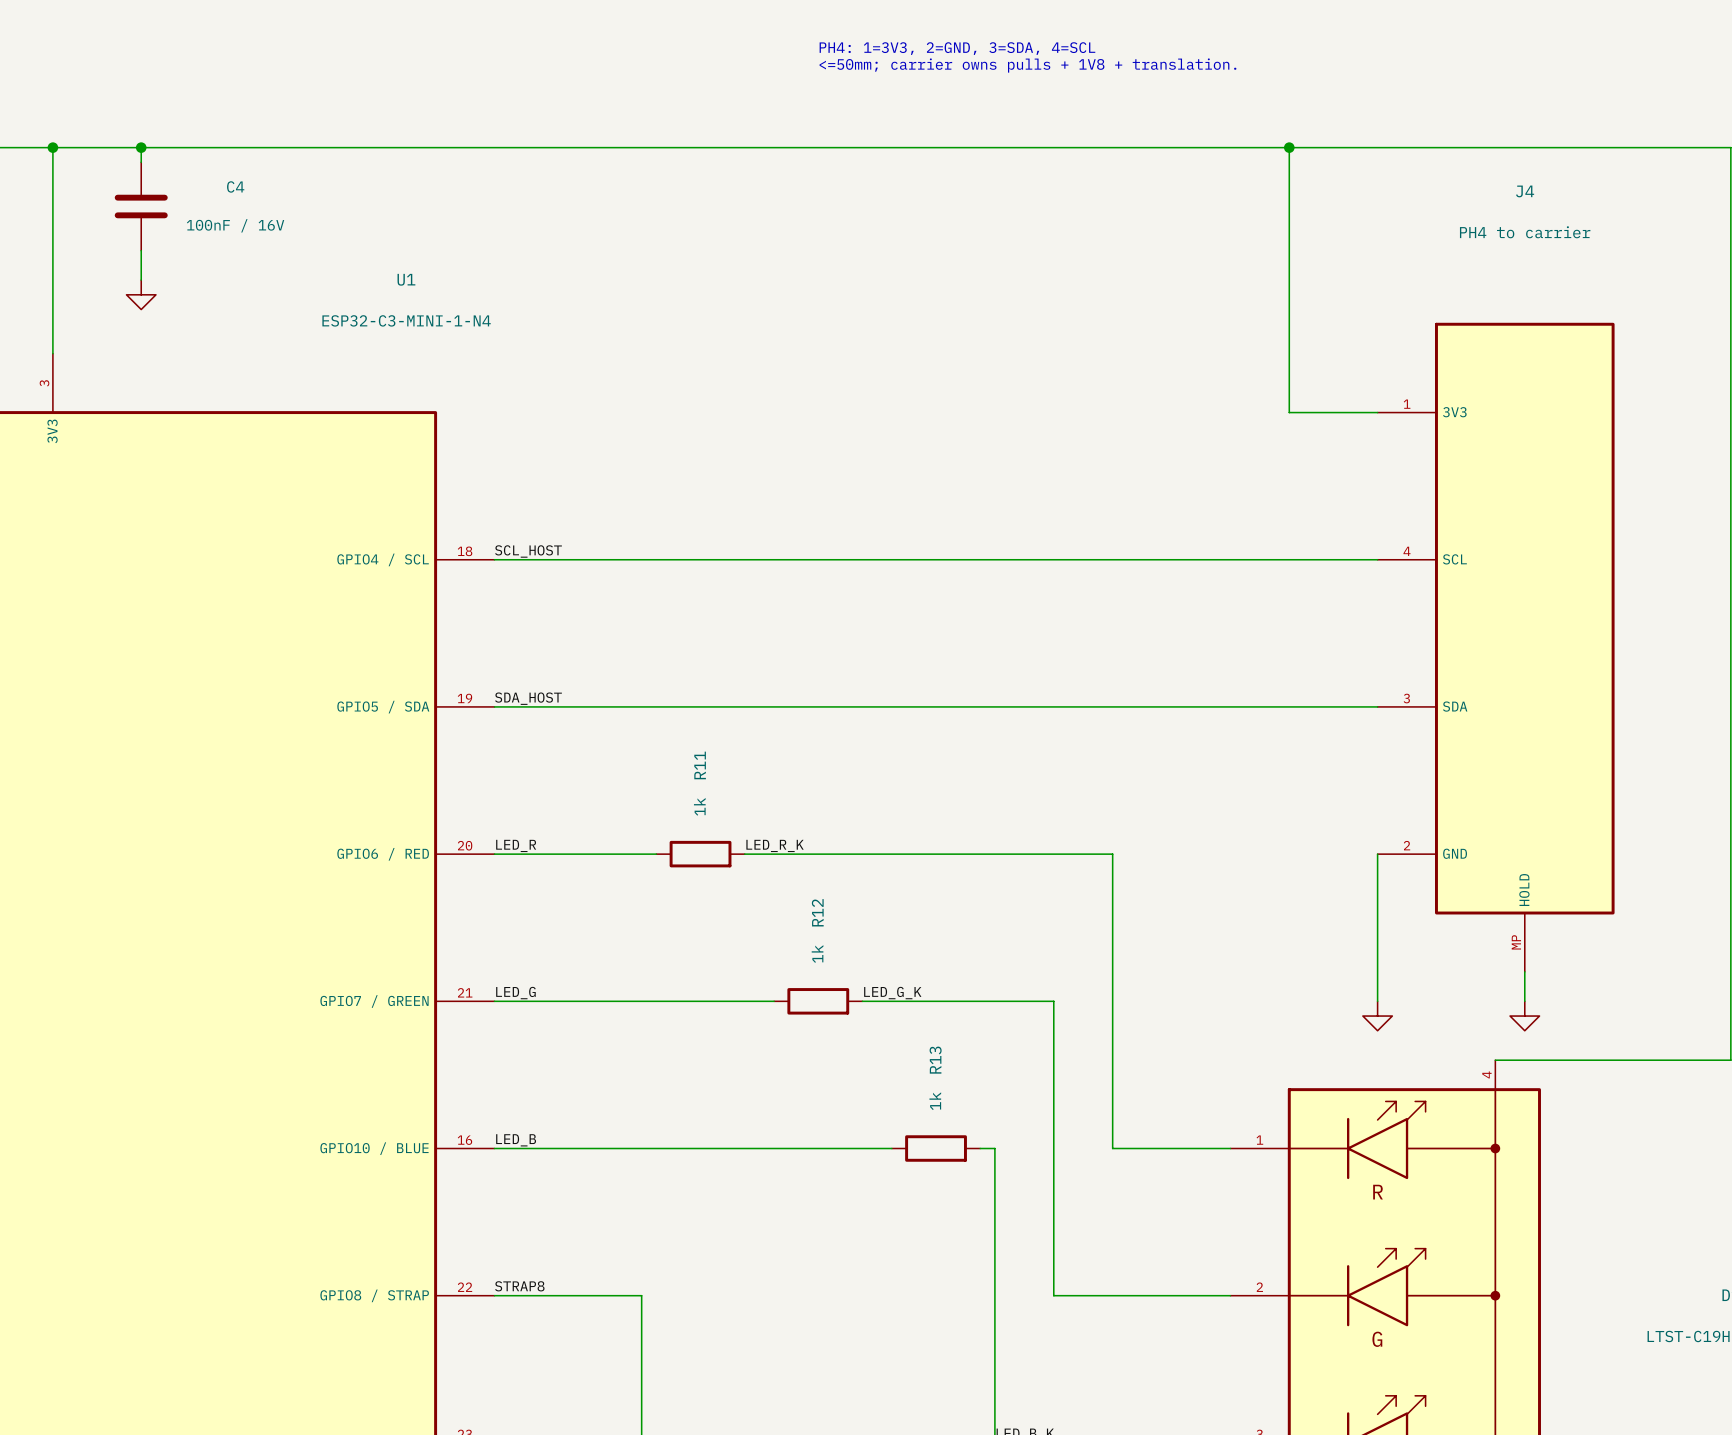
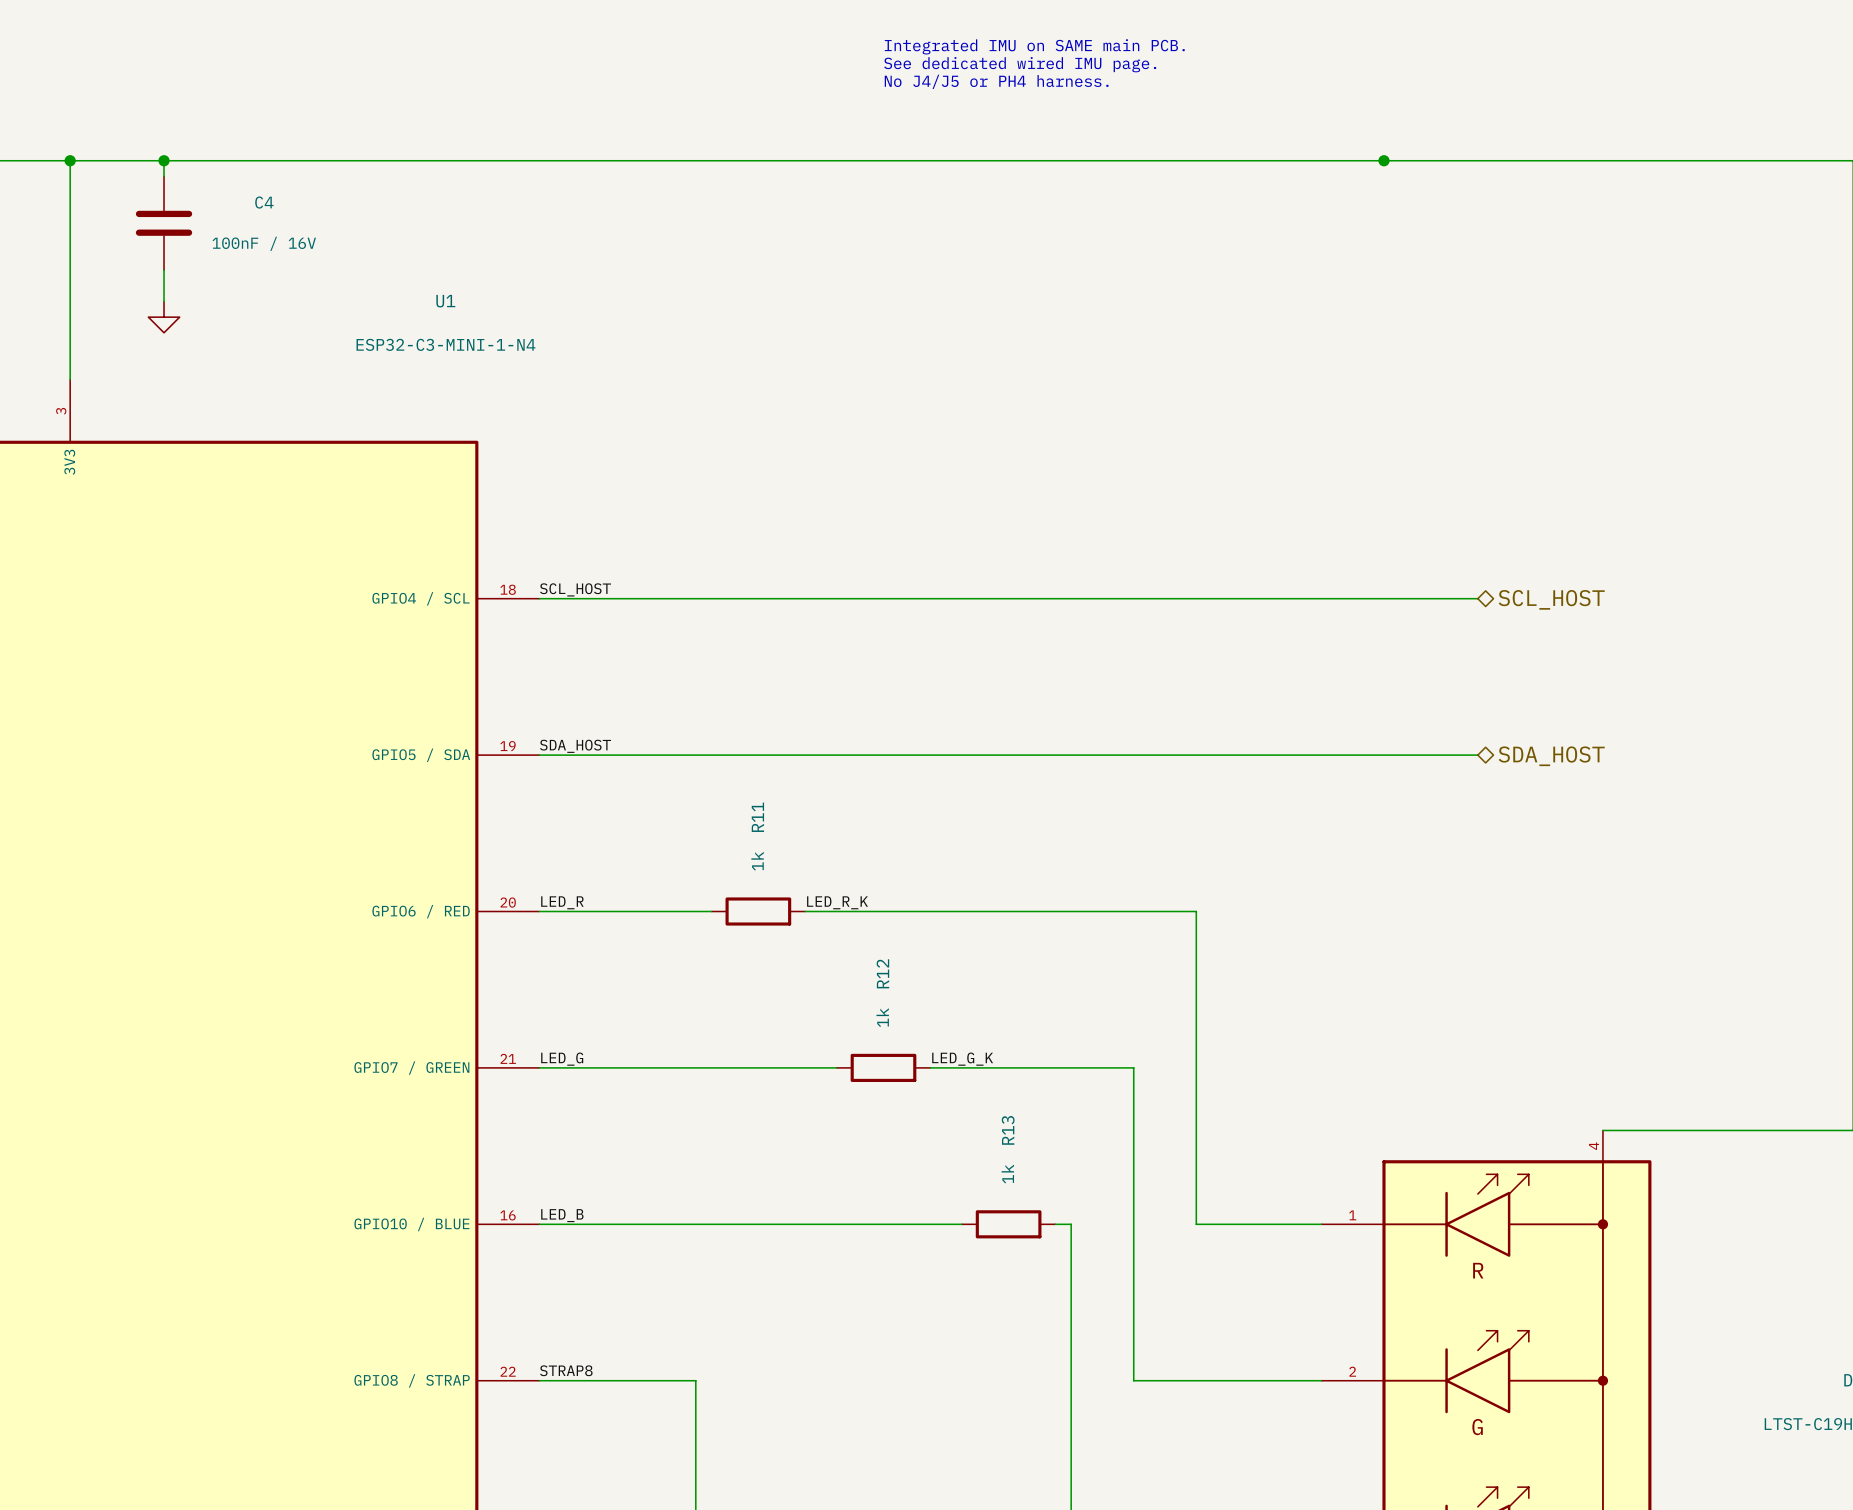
text: none -> Integrated IMU on SAME main PCB. (1034, 46)
text: PH4: 1=3V3, 2=GND, 3=SDA, 4=SCL (957, 48) -> none
text: none -> See dedicated wired IMU page. (1020, 64)
text: <=50mm; carrier owns pulls + 1V8 + translation. (1027, 65) -> none
text: none -> No J4/J5 or PH4 harness. (996, 81)
wire: (1289, 147) (1289, 412) (1377, 412) -> none
hierarchical label: none -> SCL_HOST (1551, 599)
J4: PH4 to carrier (1496, 647) -> none
hierarchical label: none -> SDA_HOST (1551, 756)
wire: (1377, 854) (1377, 1001) -> none
wire: (1524, 971) (1524, 1001) -> none
power symbol: (1377, 1016) -> none
power symbol: (1524, 1016) -> none

